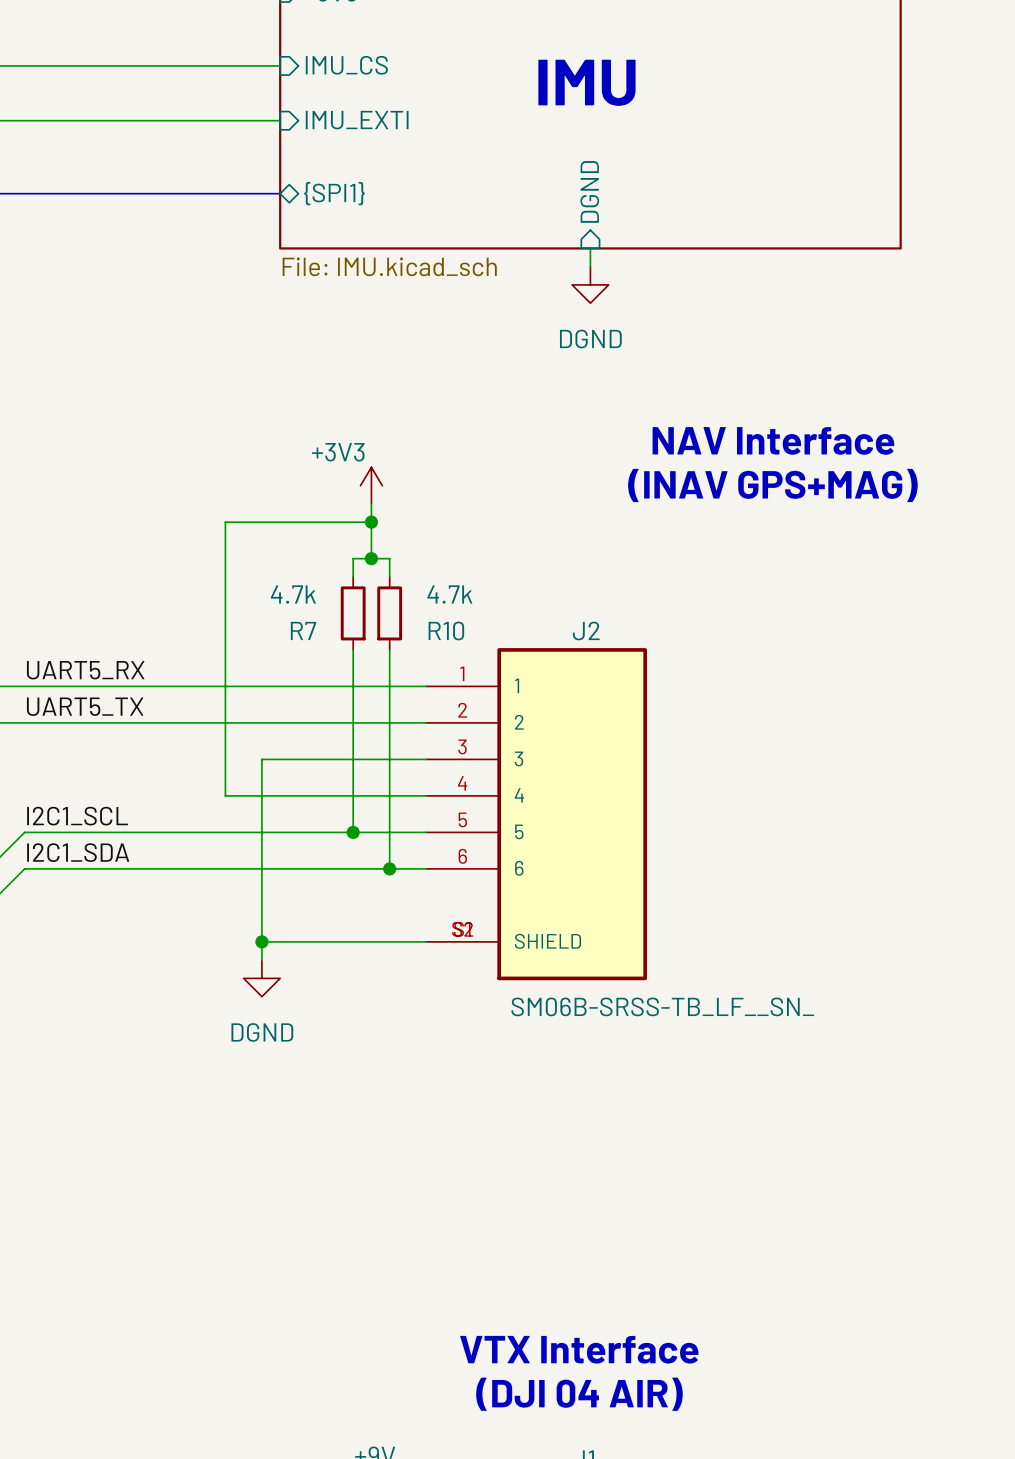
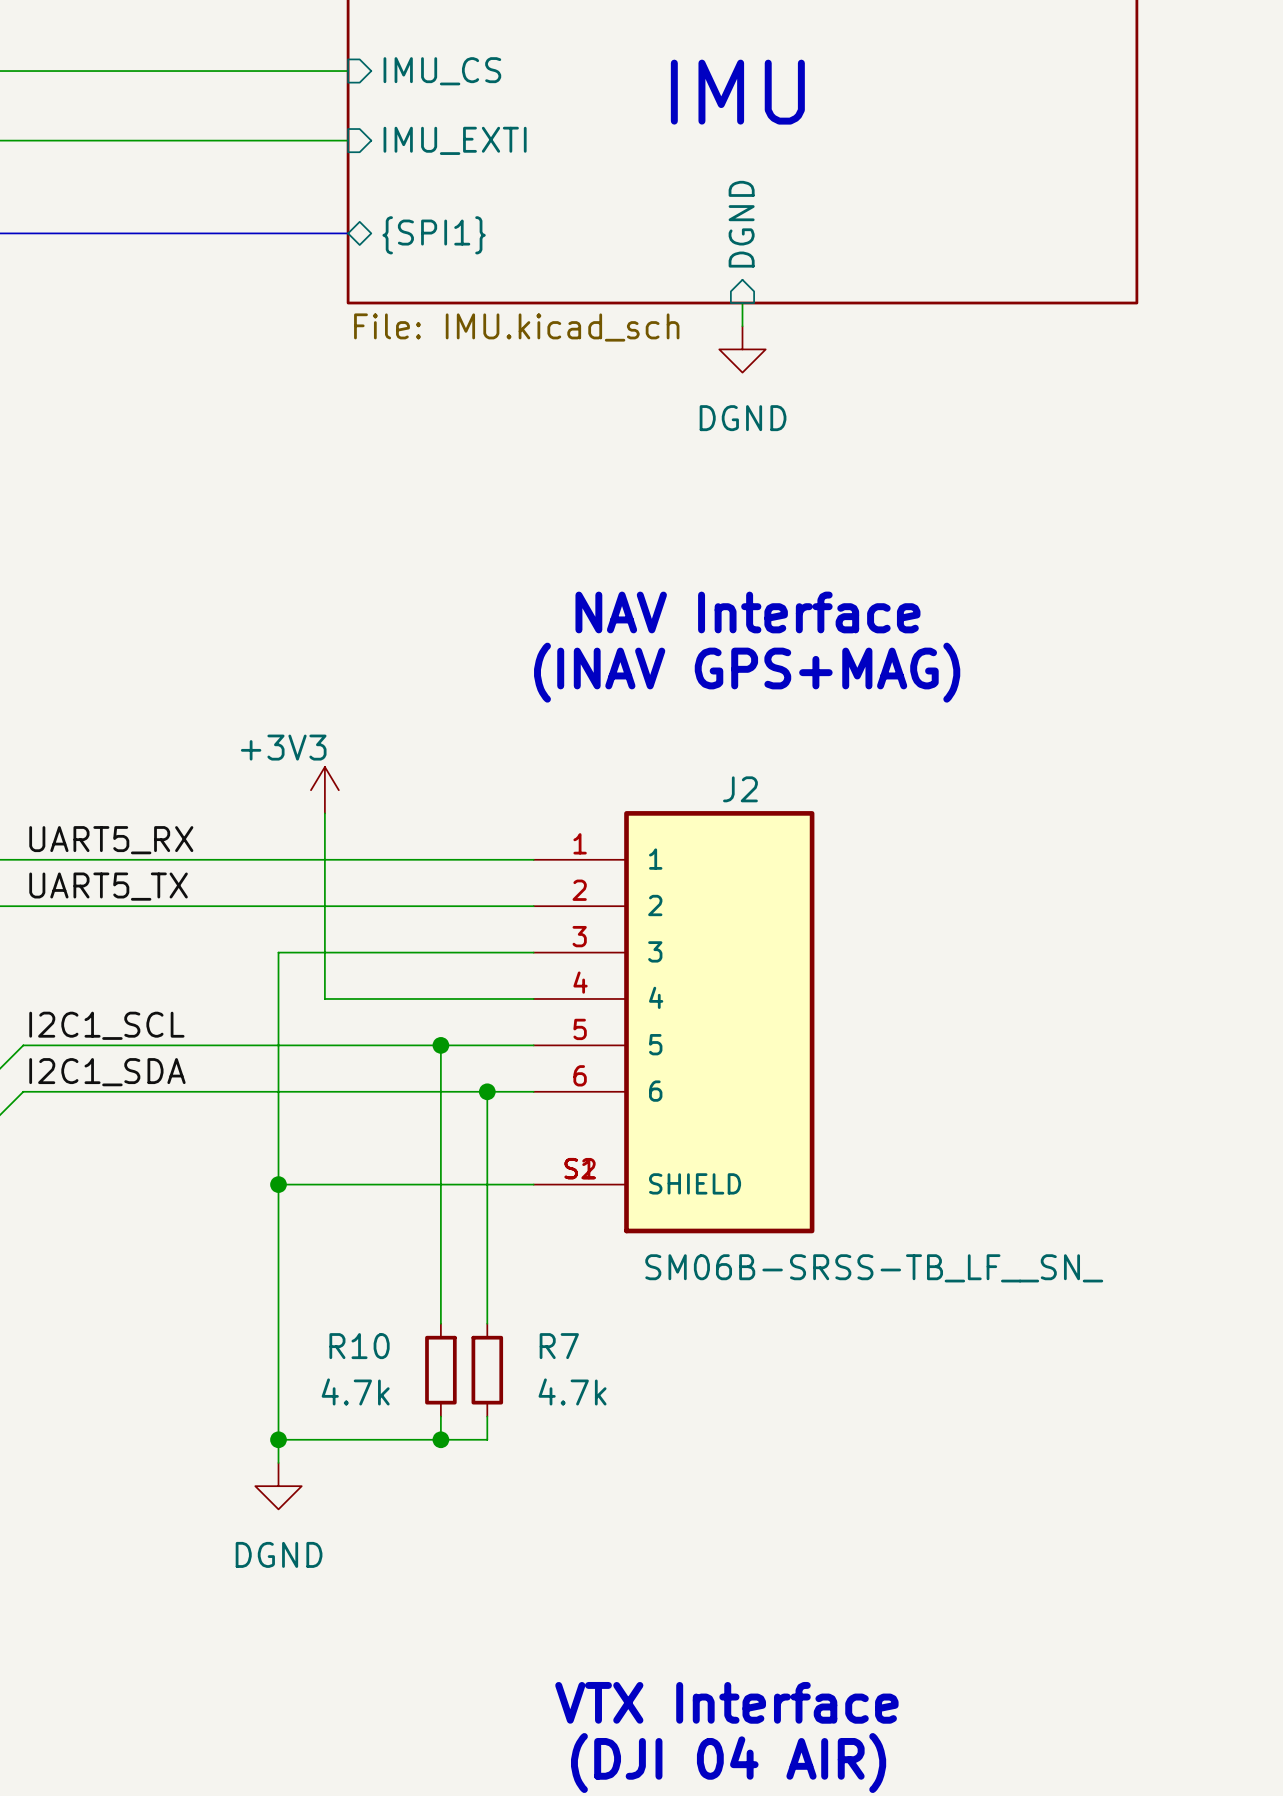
text position: NAV Interface (773, 440) -> NAV Interface (747, 612)
power symbol position: +3V3 (371, 485) -> +3V3 (324, 790)
text position: (INAV GPS+MAG) (772, 485) -> (INAV GPS+MAG) (747, 672)
wire: (371, 503) (371, 558) -> none
wire: (371, 522) (225, 522) (225, 759) -> (324, 813) (324, 952) (278, 952)
junction: (371, 522) -> none
junction: (371, 558) -> none
wire: (353, 576) (353, 558) (389, 558) (389, 576) -> none
R7 value position: 4.7k (293, 594) -> 4.7k (572, 1391)
R10 value position: 4.7k (449, 594) -> 4.7k (355, 1391)
R7 position: (353, 613) -> (487, 1370)
R10 position: (389, 613) -> (440, 1370)
R7 name position: R7 (303, 630) -> R7 (559, 1346)
R10 name position: R10 (446, 630) -> R10 (359, 1346)
wire: (353, 649) (353, 832) -> (440, 1323) (440, 1045)
wire: (389, 649) (389, 868) -> (487, 1323) (487, 1091)
wire: (225, 795) (261, 795) (261, 960) -> (278, 998) (278, 1462)
wire: none -> (278, 1184) (324, 1184)
junction position: (261, 941) -> (278, 1184)
power symbol position: DGND (261, 978) -> DGND (278, 1486)
wire: none -> (440, 1416) (440, 1439)
wire: none -> (487, 1416) (487, 1439) (278, 1439)
junction: none -> (278, 1439)
junction: none -> (440, 1439)

